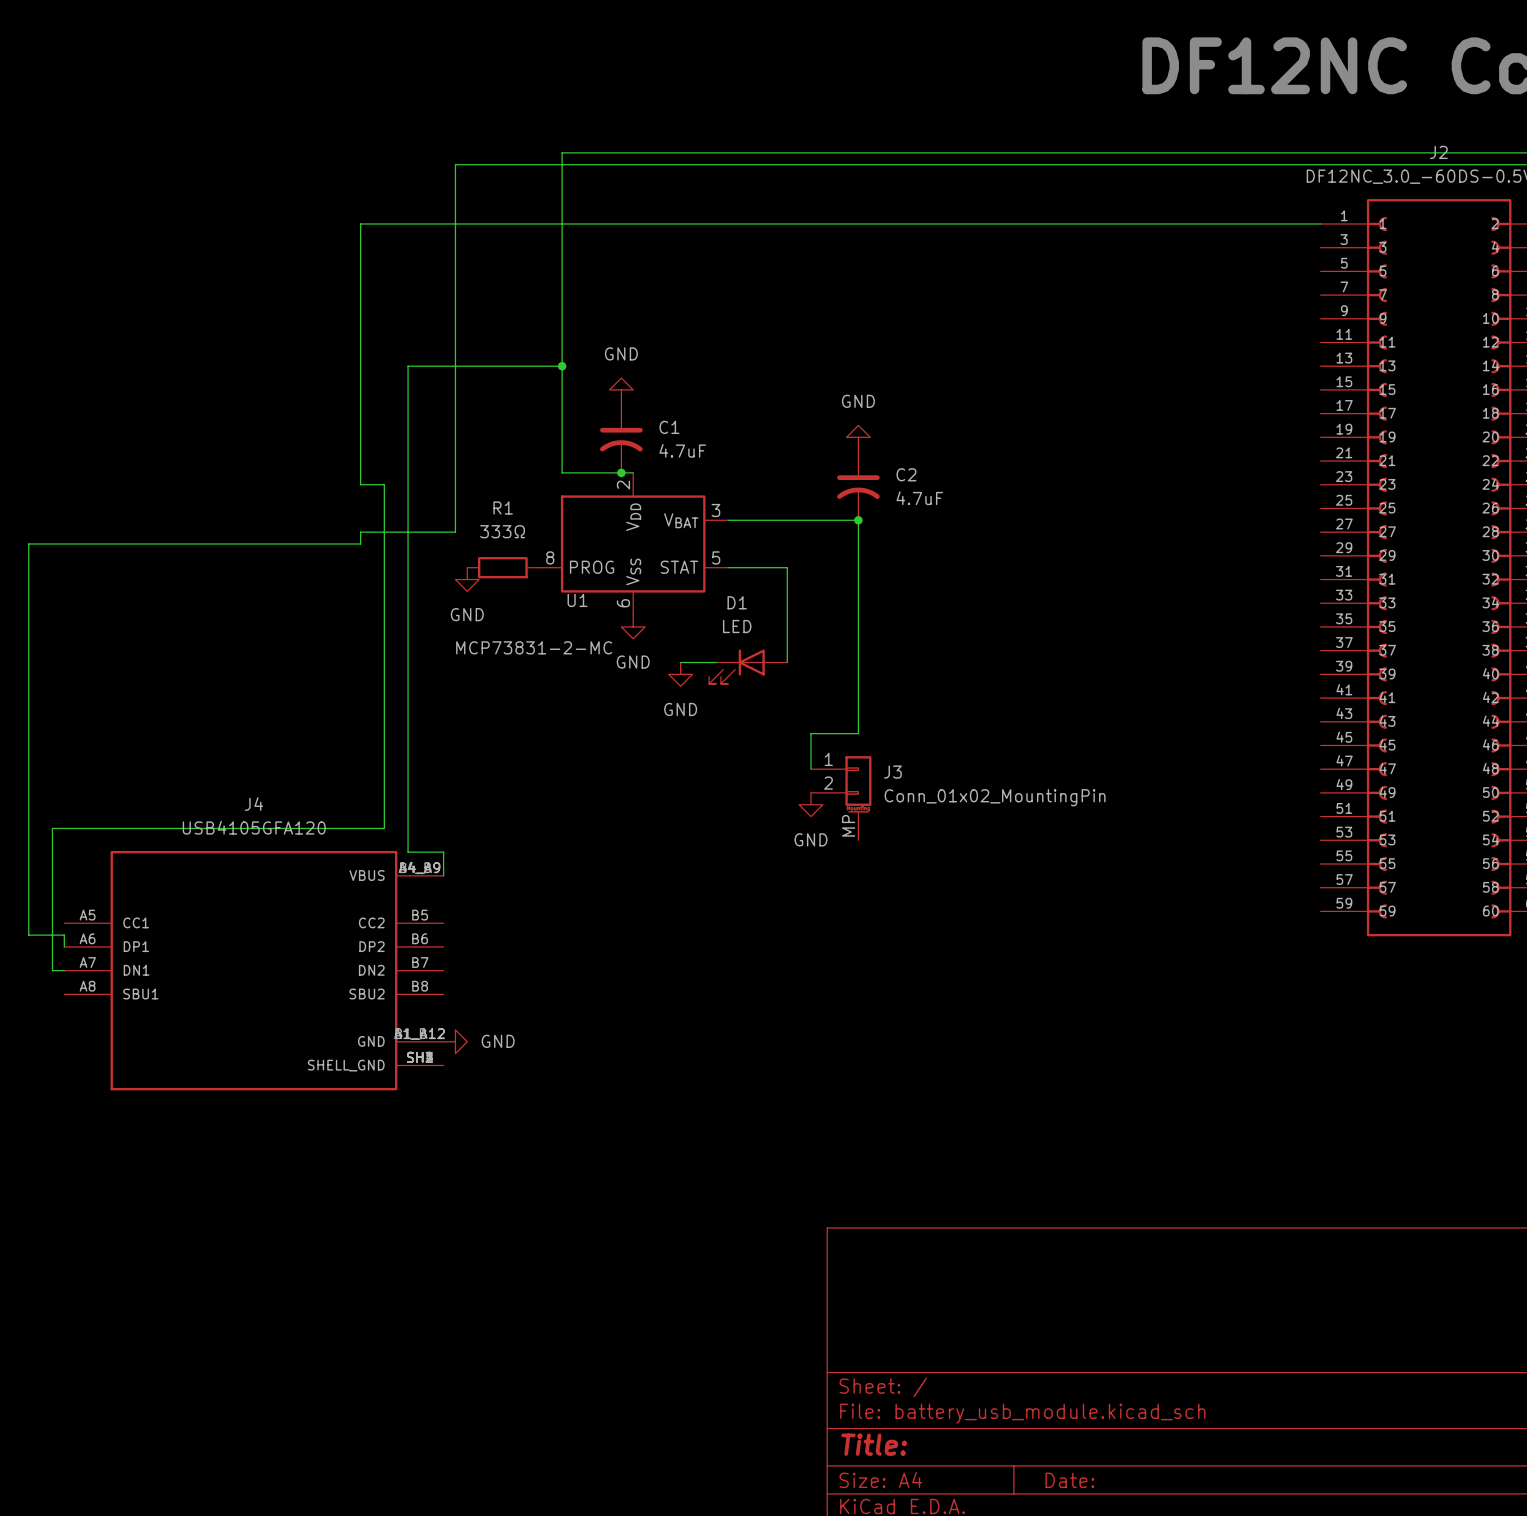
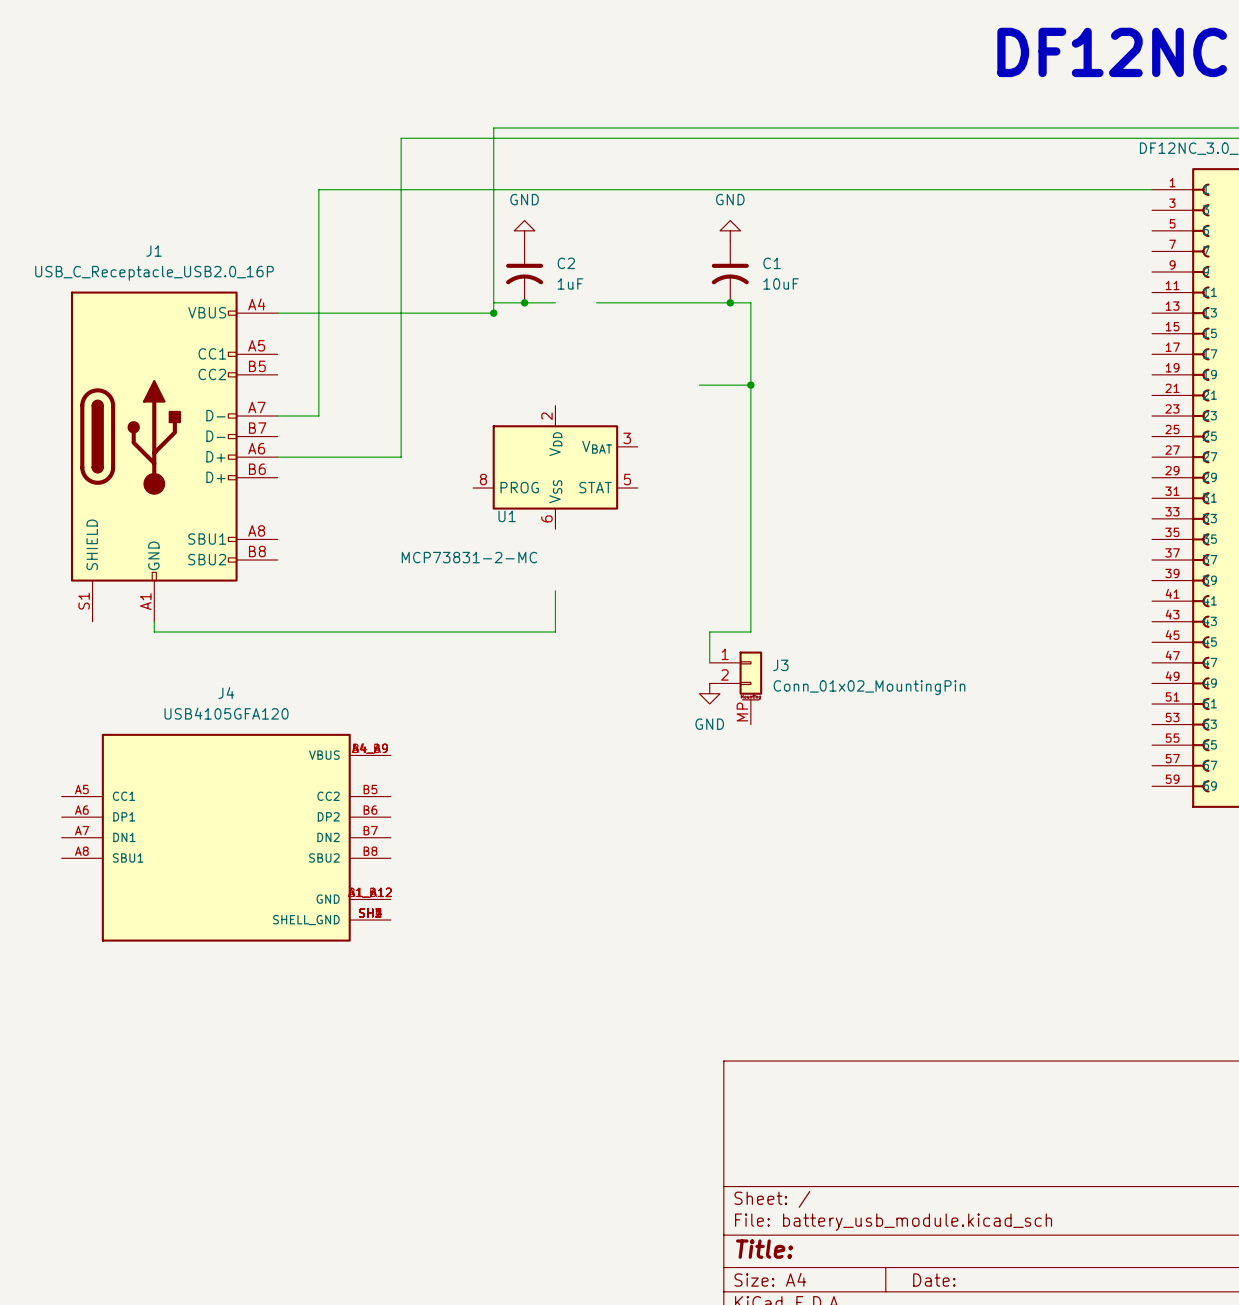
power symbol: none -> GND (730, 230)
wire: none -> (493, 302) (555, 302)
junction: none -> (524, 302)
junction: none -> (730, 302)
wire: (408, 366) (408, 852) (443, 852) (443, 875) -> (360, 313) (277, 313)
wire: (562, 366) (562, 472) (633, 472) -> none
power symbol position: GND (621, 389) -> GND (524, 230)
C1 position: (621, 437) -> (730, 272)
power symbol: GND (858, 437) -> none
wire: none -> (699, 385) (750, 385)
junction: none -> (750, 385)
C1 value: 4.7uF (682, 450) -> 10uF (781, 283)
junction: (621, 472) -> none
wire: (360, 484) (384, 484) (384, 828) (52, 828) (52, 970) (64, 970) -> (318, 416) (277, 416)
C2 position: (858, 484) -> (524, 272)
C2 value: 4.7uF (919, 498) -> 1uF (570, 283)
wire: (728, 520) (858, 520) -> (596, 302) (750, 302) (750, 446)
junction: (858, 520) -> none
J1: none -> USB_C_Receptacle_USB2.0_16P (174, 456)
wire: (360, 532) (360, 543) (28, 543) (28, 935) (64, 935) (64, 946) -> (318, 457) (277, 457)
R1: 333Ω (502, 567) -> none
wire: (728, 567) (787, 567) (787, 662) -> none
power symbol: GND (467, 579) -> none
power symbol: GND (633, 626) -> none
wire: (680, 662) (716, 662) -> none
D1: LED (748, 666) -> none
power symbol: GND (680, 674) -> none
wire: none -> (555, 590) (555, 632) (154, 632) (154, 621)
power symbol: GND (455, 1041) -> none

